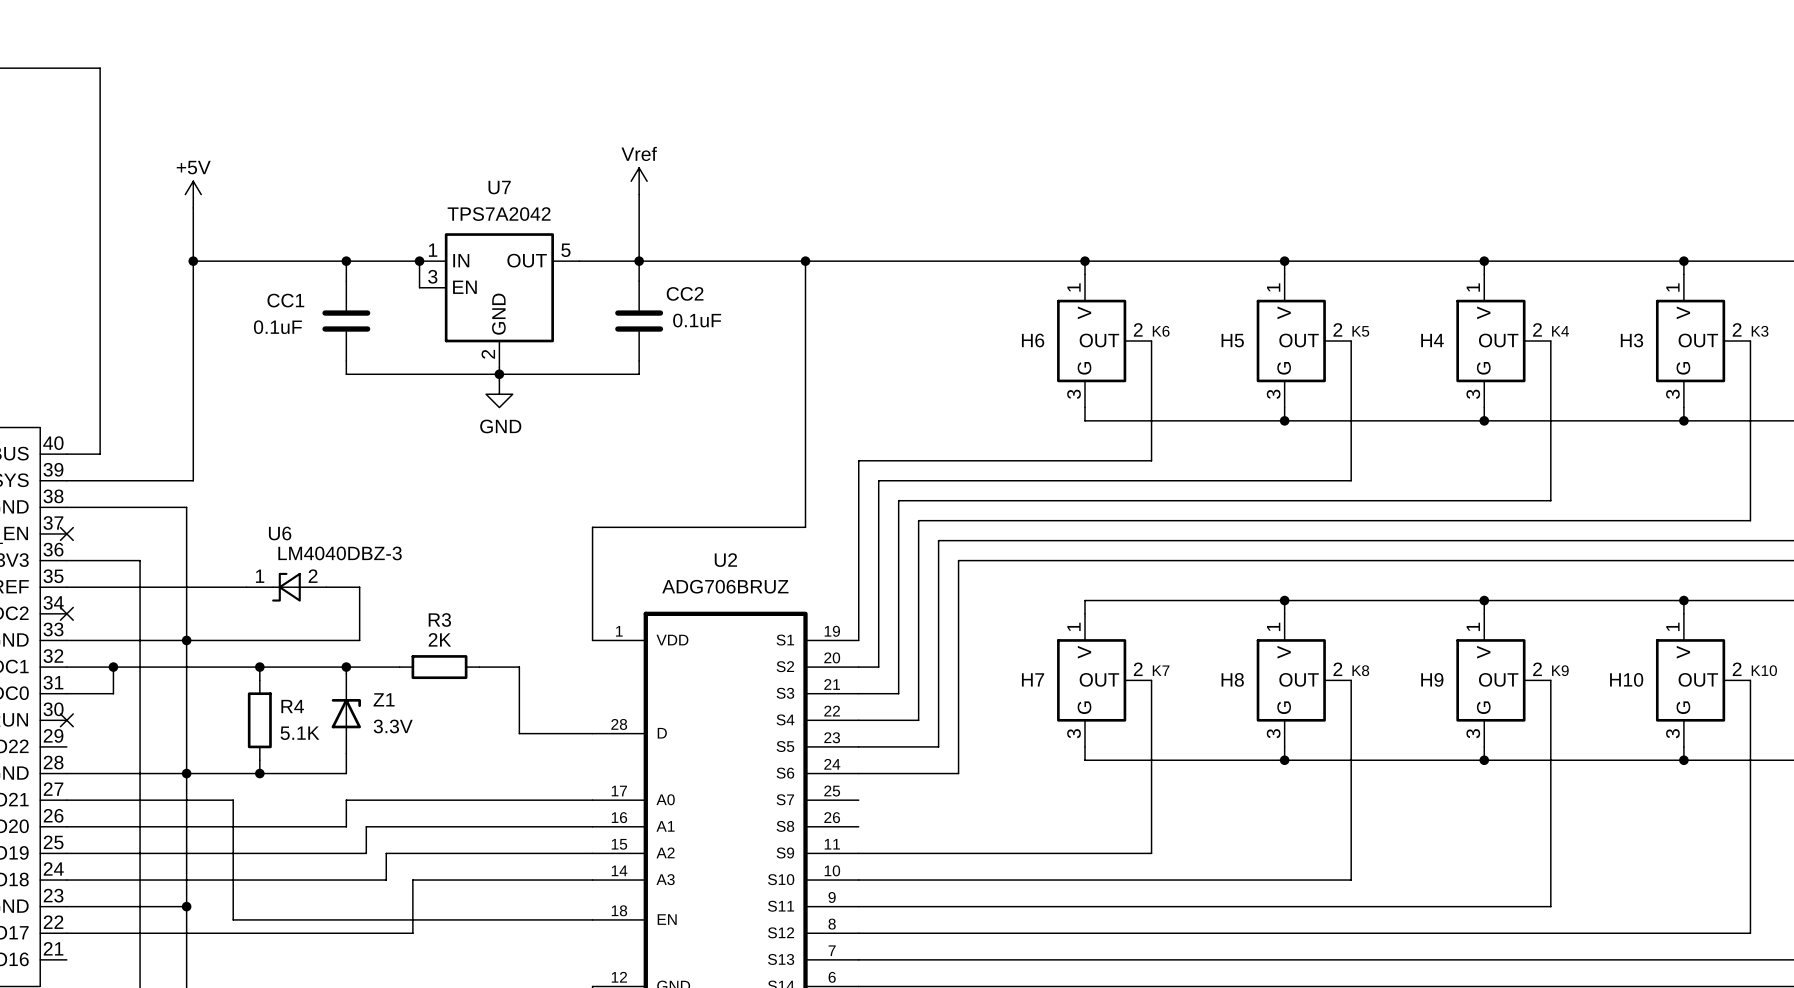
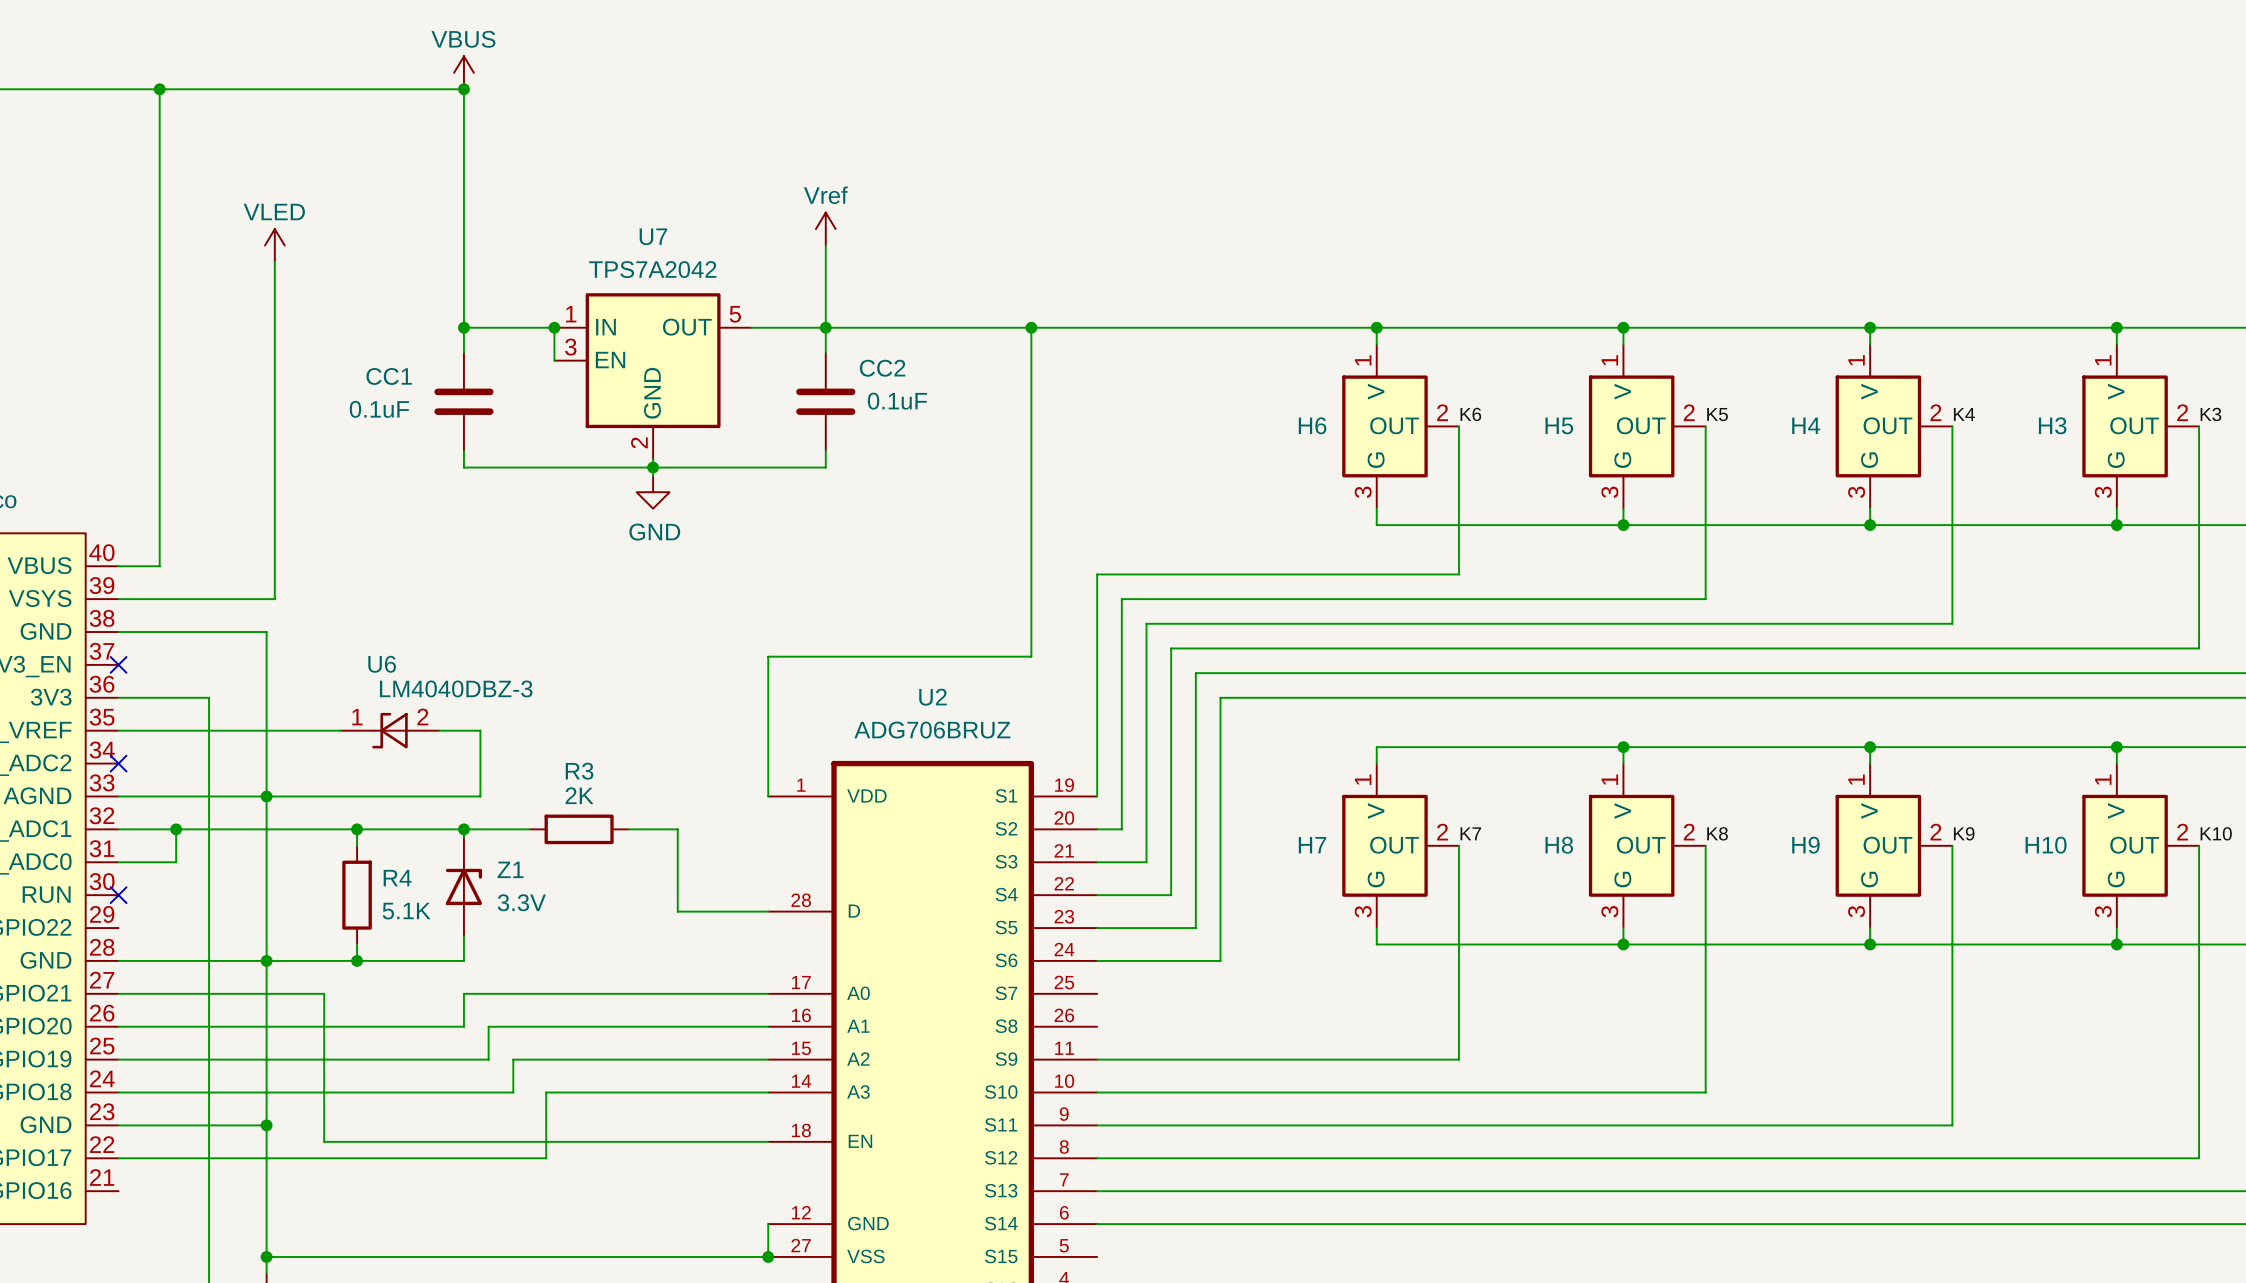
power symbol: none -> VBUS (463, 72)
junction: none -> (159, 89)
junction: none -> (463, 89)
power symbol: +5V (193, 194) -> VLED (274, 245)
wire: (193, 261) (346, 261) -> (159, 89) (463, 89) (463, 327)
junction: (193, 261) -> none

